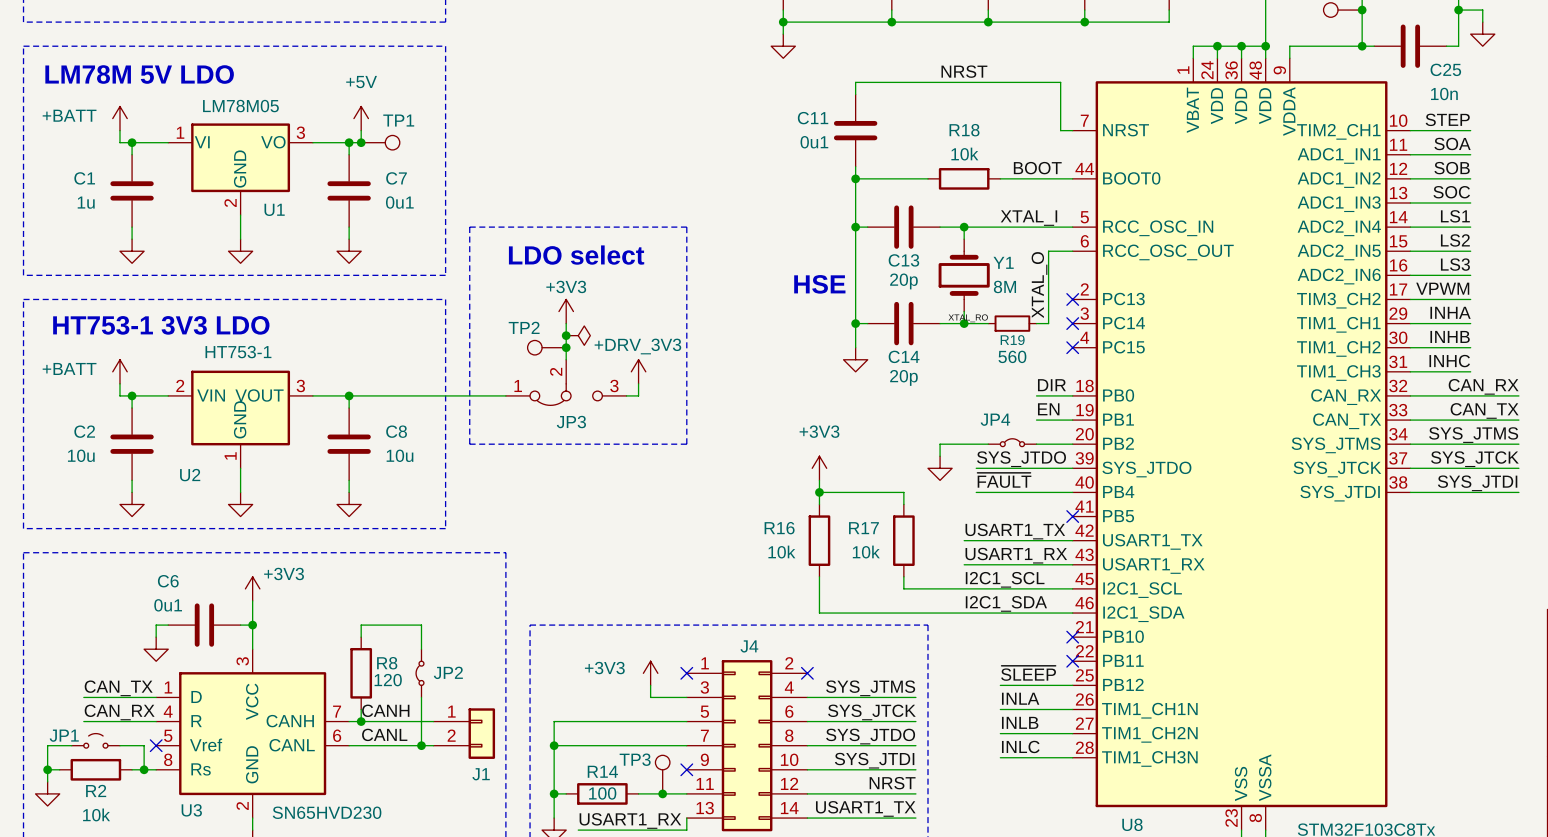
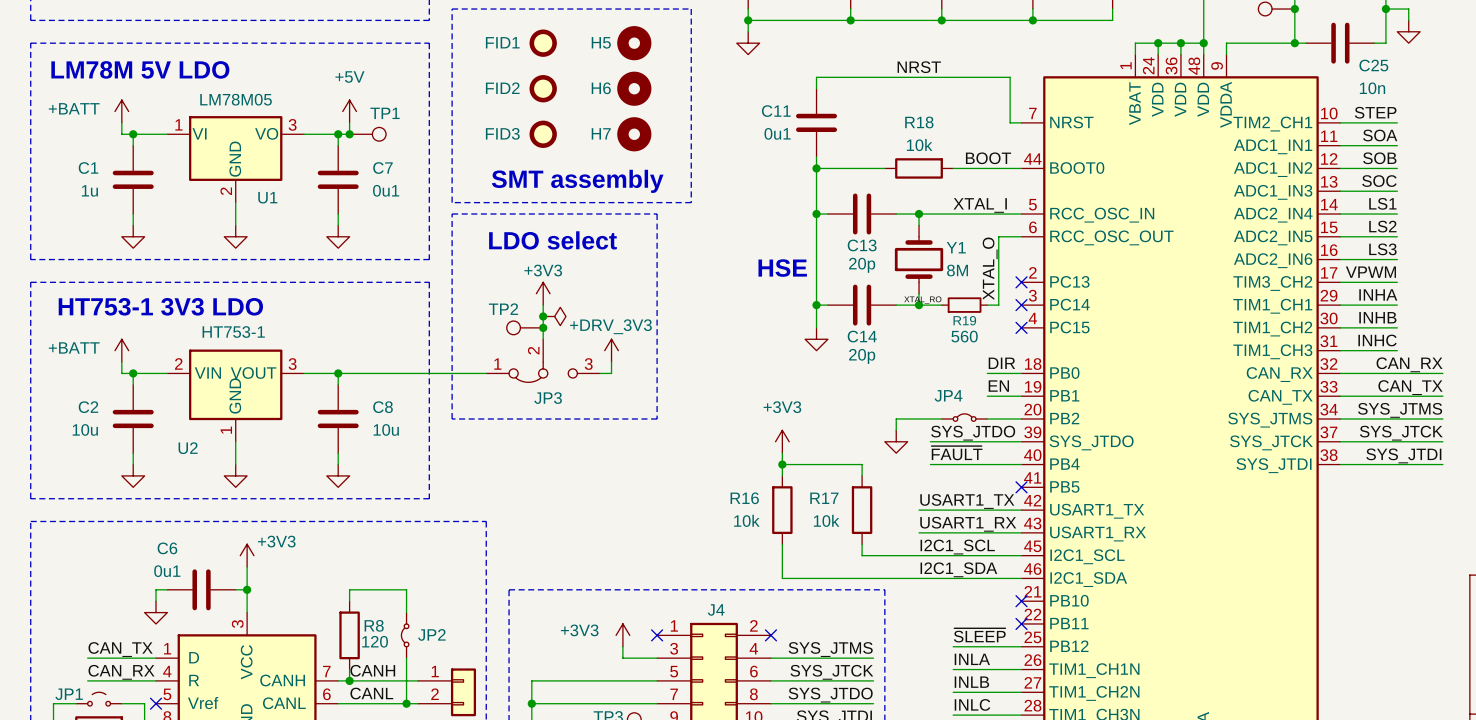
line: none -> (452, 9) (691, 9) (691, 202) (452, 202) (452, 9)
FID1: none -> (543, 43)
H5: none -> (634, 43)
FID2: none -> (543, 88)
H6: none -> (634, 88)
FID3: none -> (543, 134)
H7: none -> (634, 134)
text: none -> SMT assembly (577, 181)

